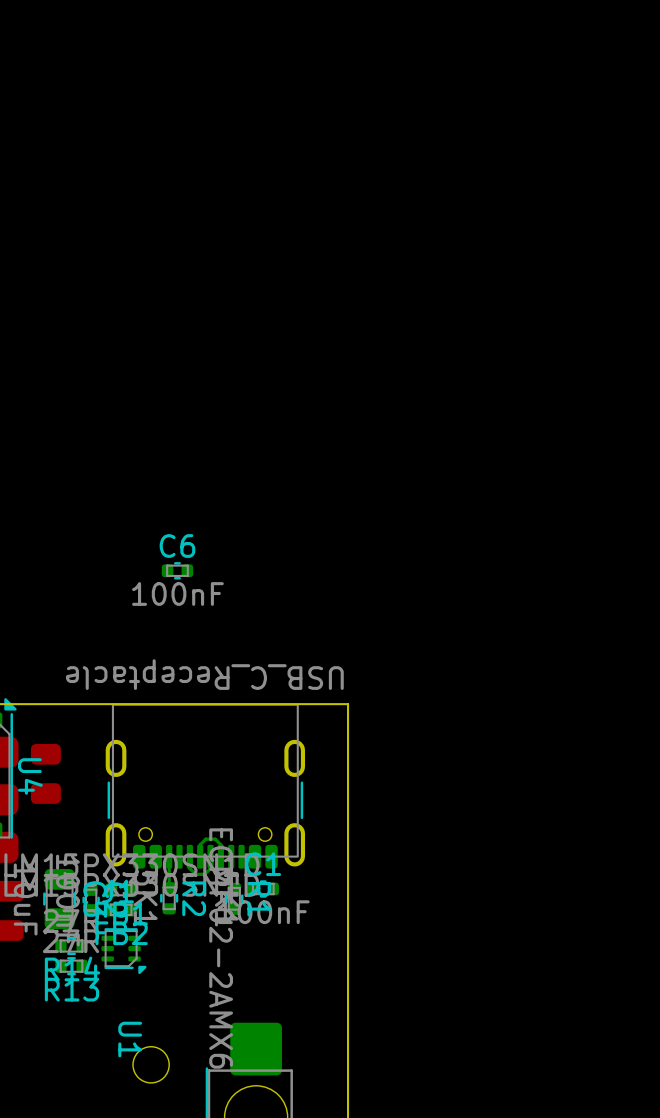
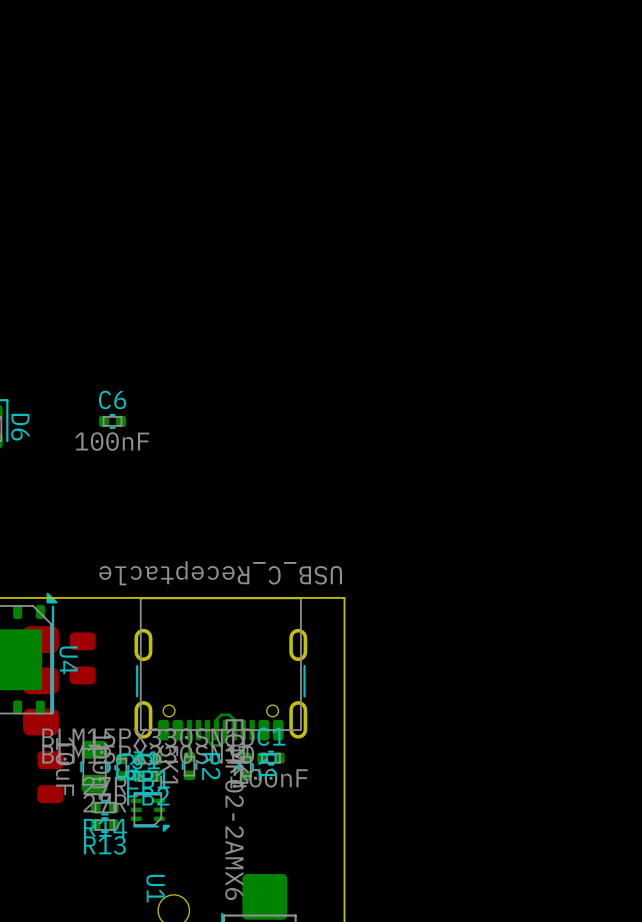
C6 position: (177, 570) -> (112, 421)

